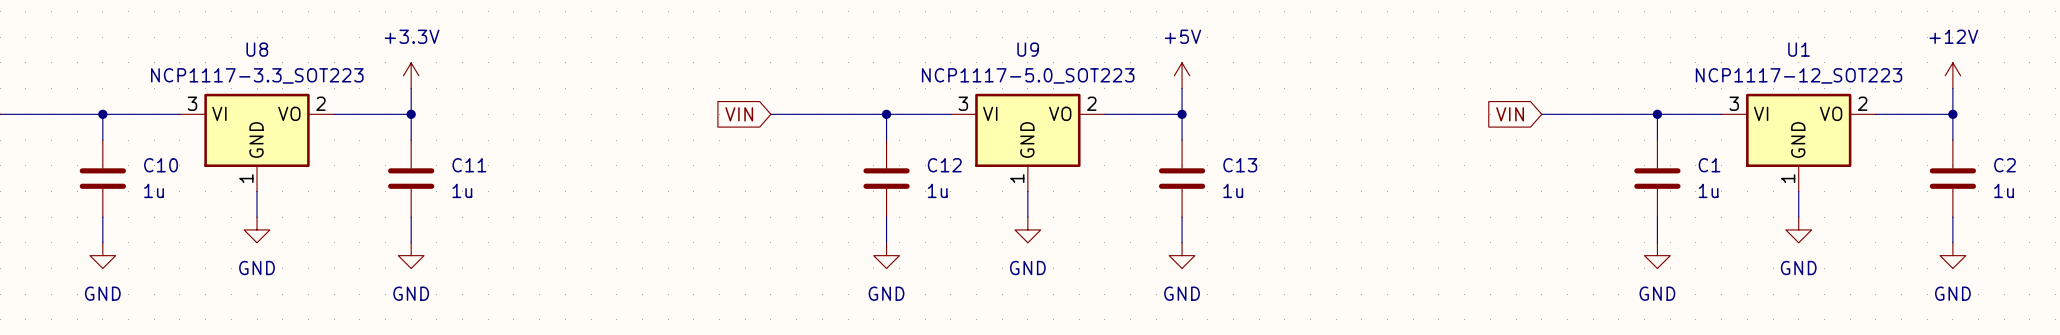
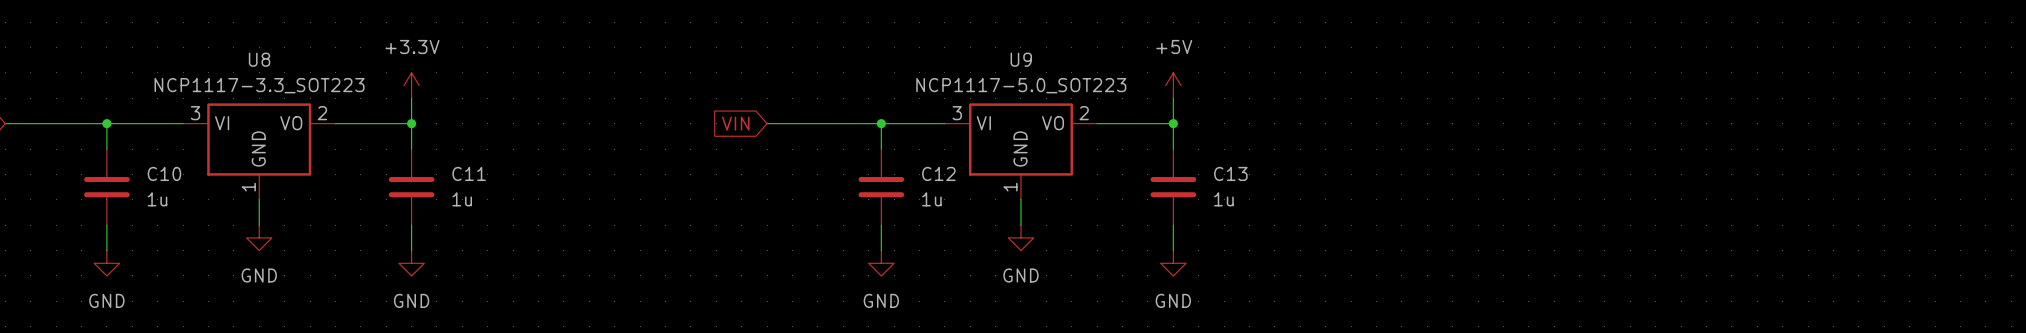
power symbol: +12V (1952, 75) -> none
wire: (1952, 88) (1952, 140) -> none
global label: VIN (1510, 114) -> none
wire: (1541, 114) (1721, 114) -> none
wire: (1657, 114) (1657, 140) -> none
junction: (1657, 114) -> none
wire: (1875, 114) (1952, 114) -> none
junction: (1952, 114) -> none
U1: NCP1117-12_SOT223 (1798, 142) -> none
C1: 1u (1657, 178) -> none
C2: 1u (1952, 178) -> none
wire: (1798, 191) (1798, 217) -> none
wire: (1657, 217) (1657, 242) -> none
wire: (1952, 217) (1952, 242) -> none
power symbol: GND (1798, 229) -> none
power symbol: GND (1657, 255) -> none
power symbol: GND (1952, 255) -> none

